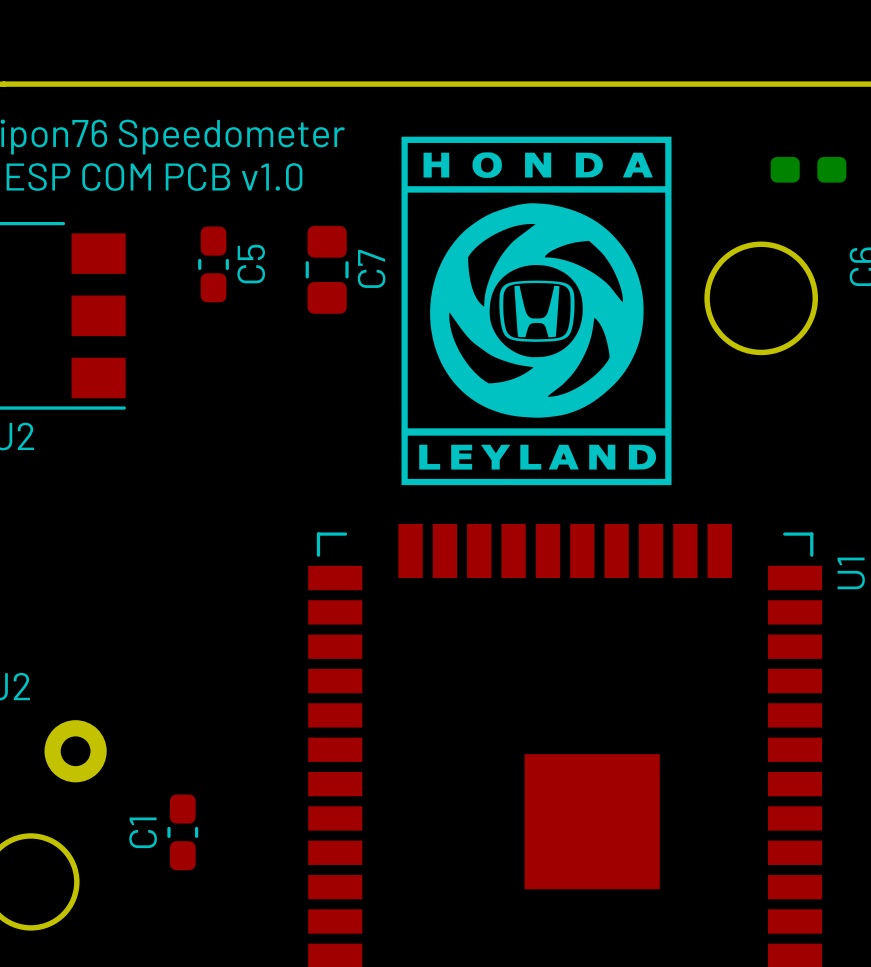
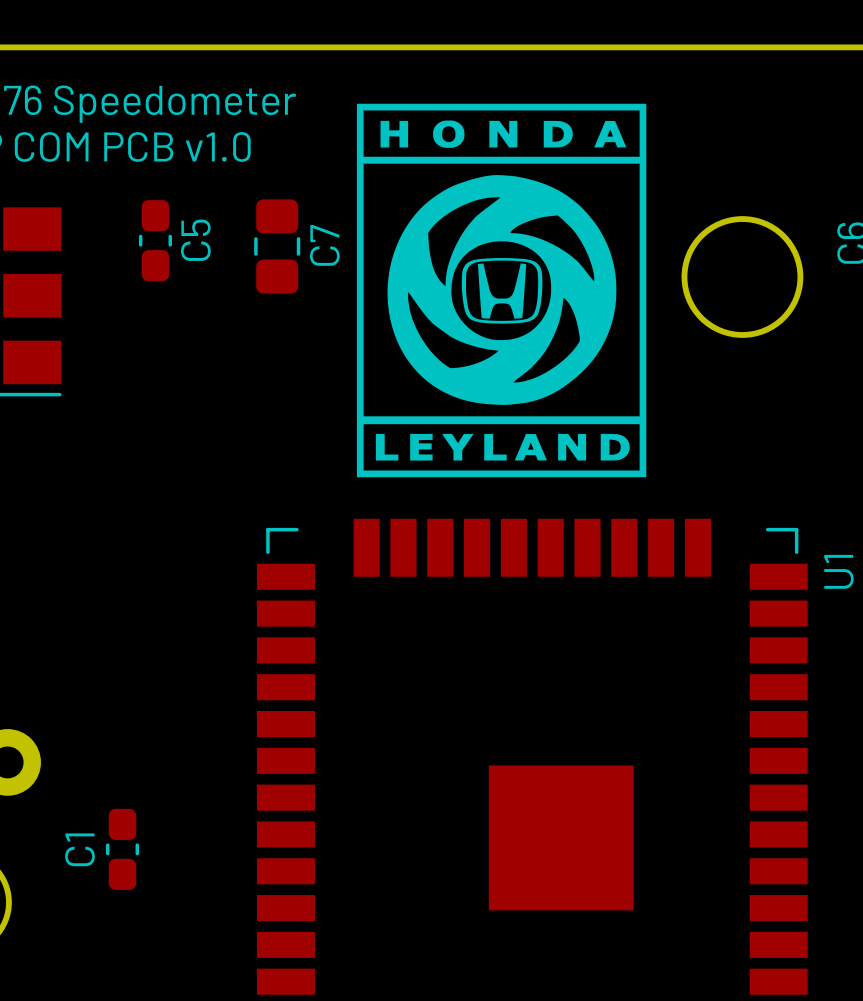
part: (808, 169) -> none

